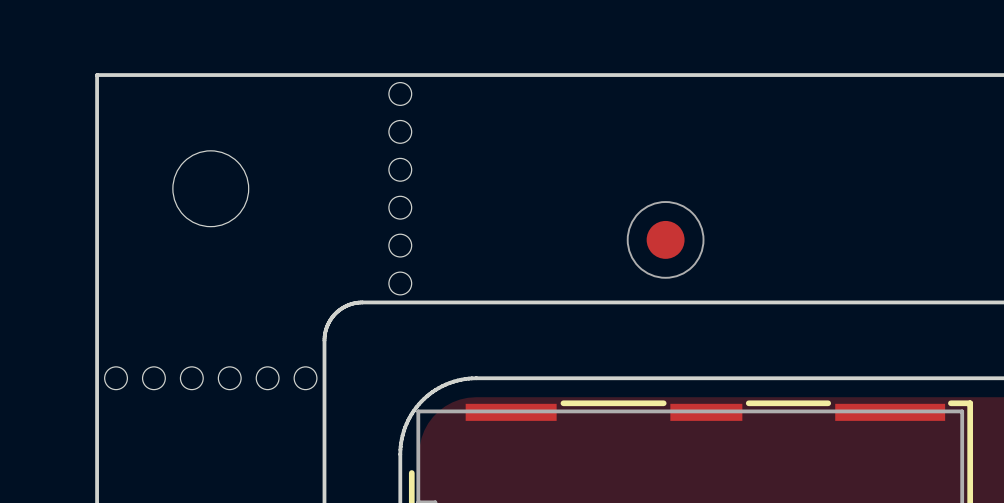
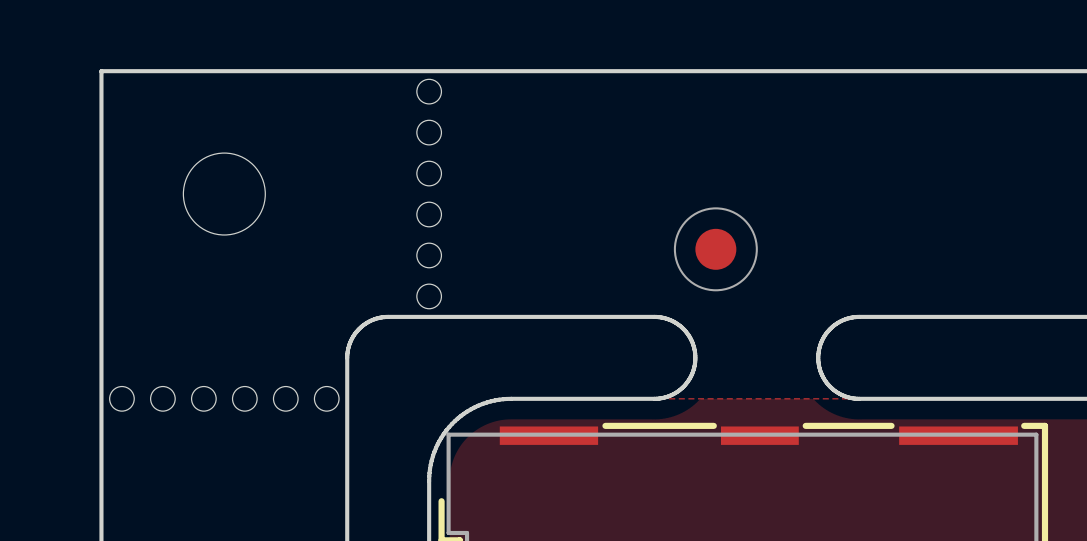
board edge: (608, 302) (798, 302) -> (654, 316) (670, 320) (683, 328) (692, 342) (695, 357) (692, 373) (683, 386) (670, 395) (654, 398)
board edge: (608, 378) (798, 378) -> (859, 316) (843, 320) (830, 328) (821, 342) (818, 357) (821, 373) (830, 386) (843, 395) (859, 398)

